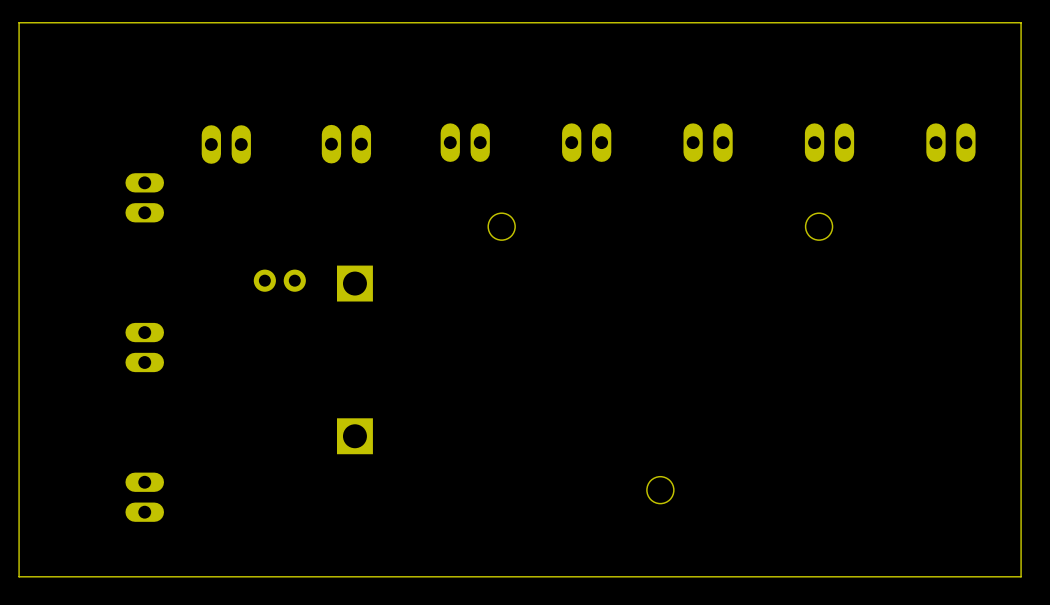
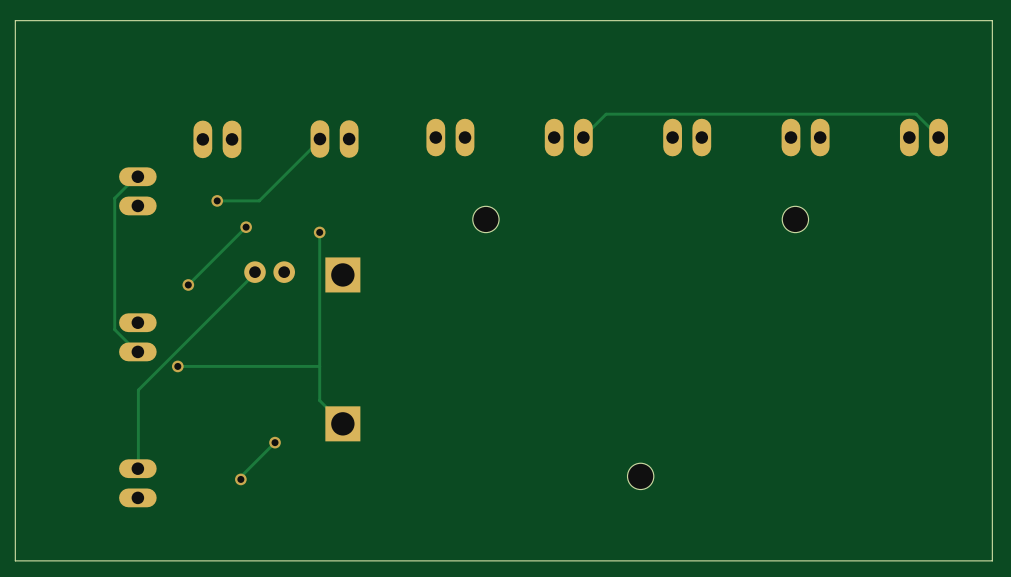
track: none -> (938, 137) (916, 114) (606, 114) (583, 137)
track: none -> (319, 139) (259, 200) (217, 200)
track: none -> (137, 176) (114, 198) (114, 329) (137, 351)
via: none -> (217, 200)
track: none -> (246, 227) (188, 284)
via: none -> (246, 227)
track: none -> (319, 232) (319, 400) (342, 423)
via: none -> (319, 232)
track: none -> (255, 272) (138, 390) (137, 468)
via: none -> (188, 284)
via: none -> (177, 366)
track: none -> (319, 366) (177, 366)
track: none -> (275, 442) (240, 476) (240, 479)
via: none -> (275, 442)
via: none -> (240, 479)

